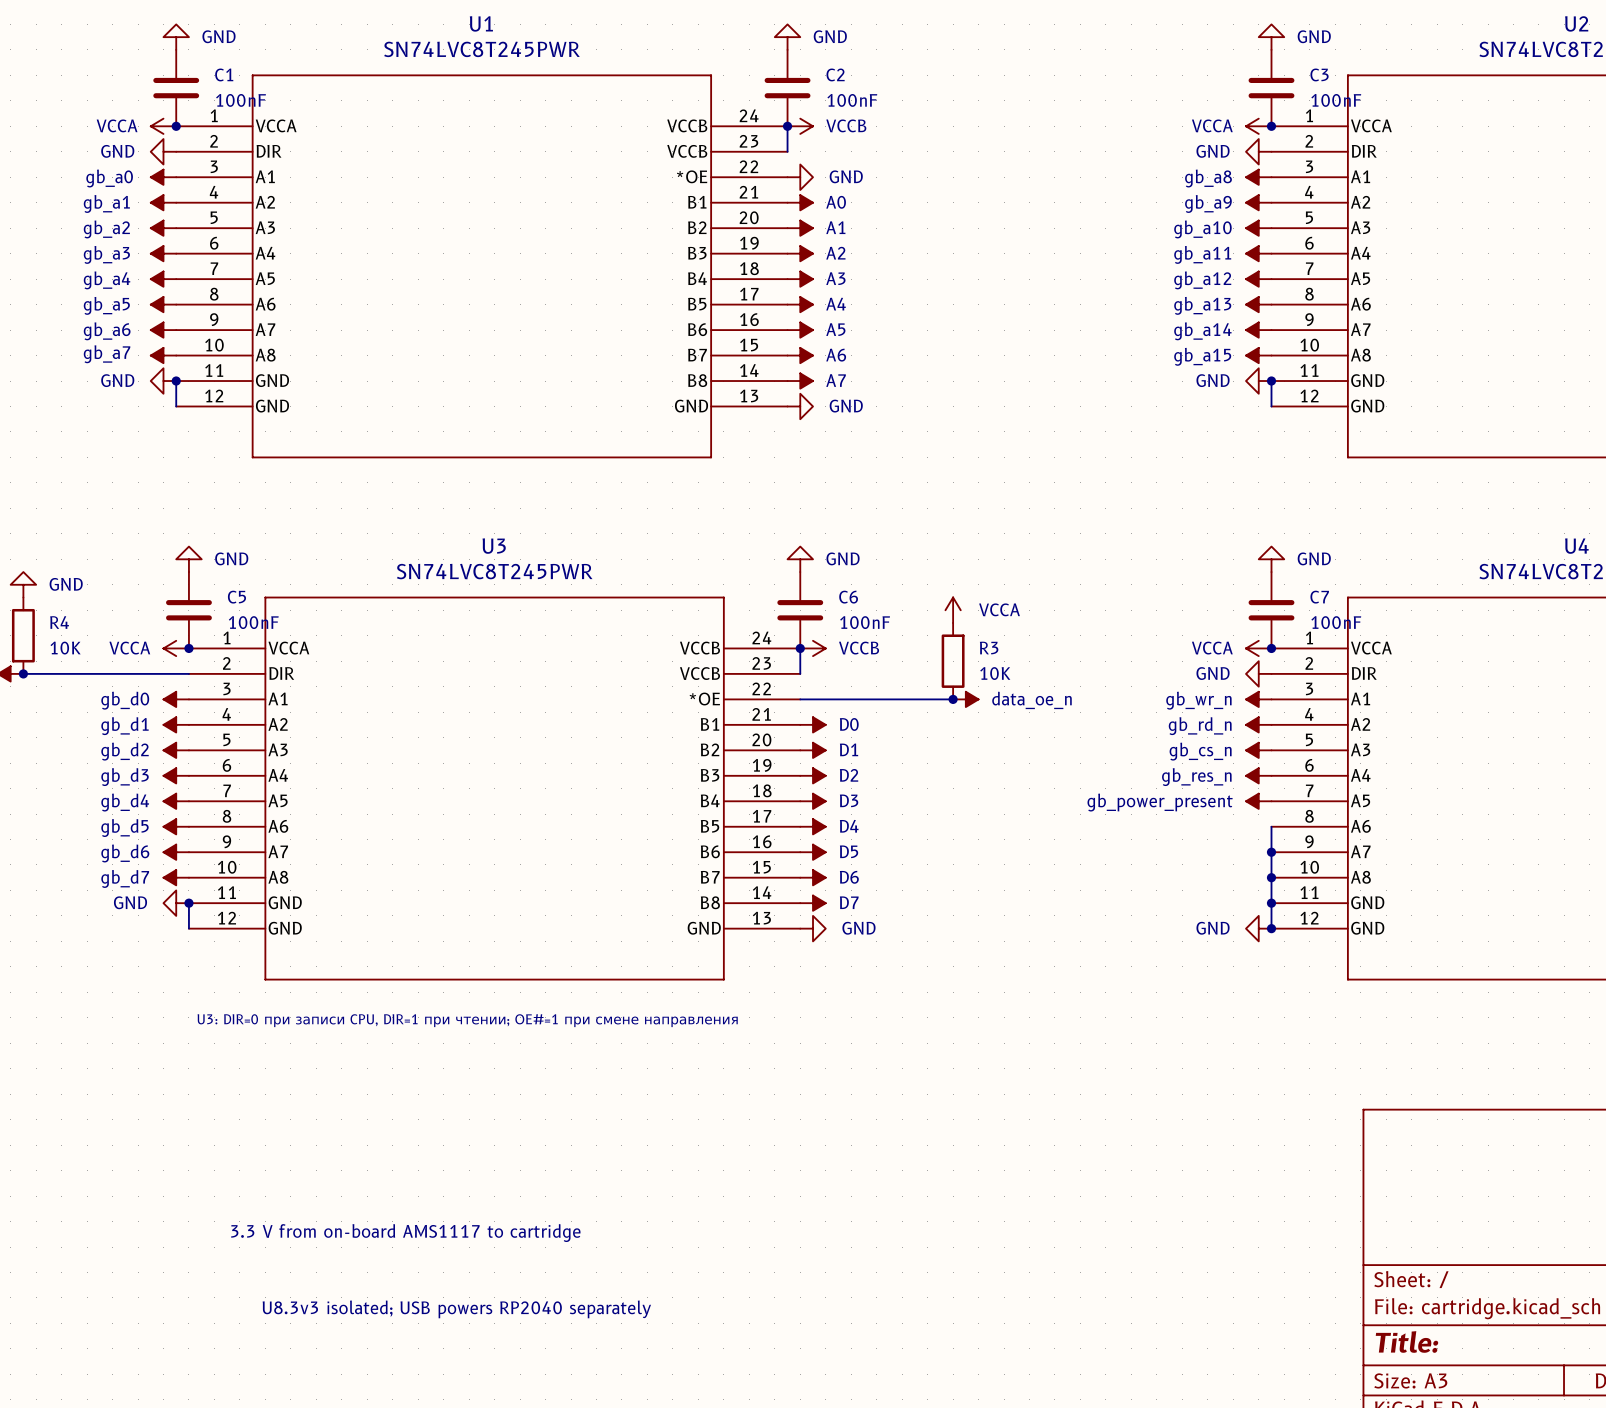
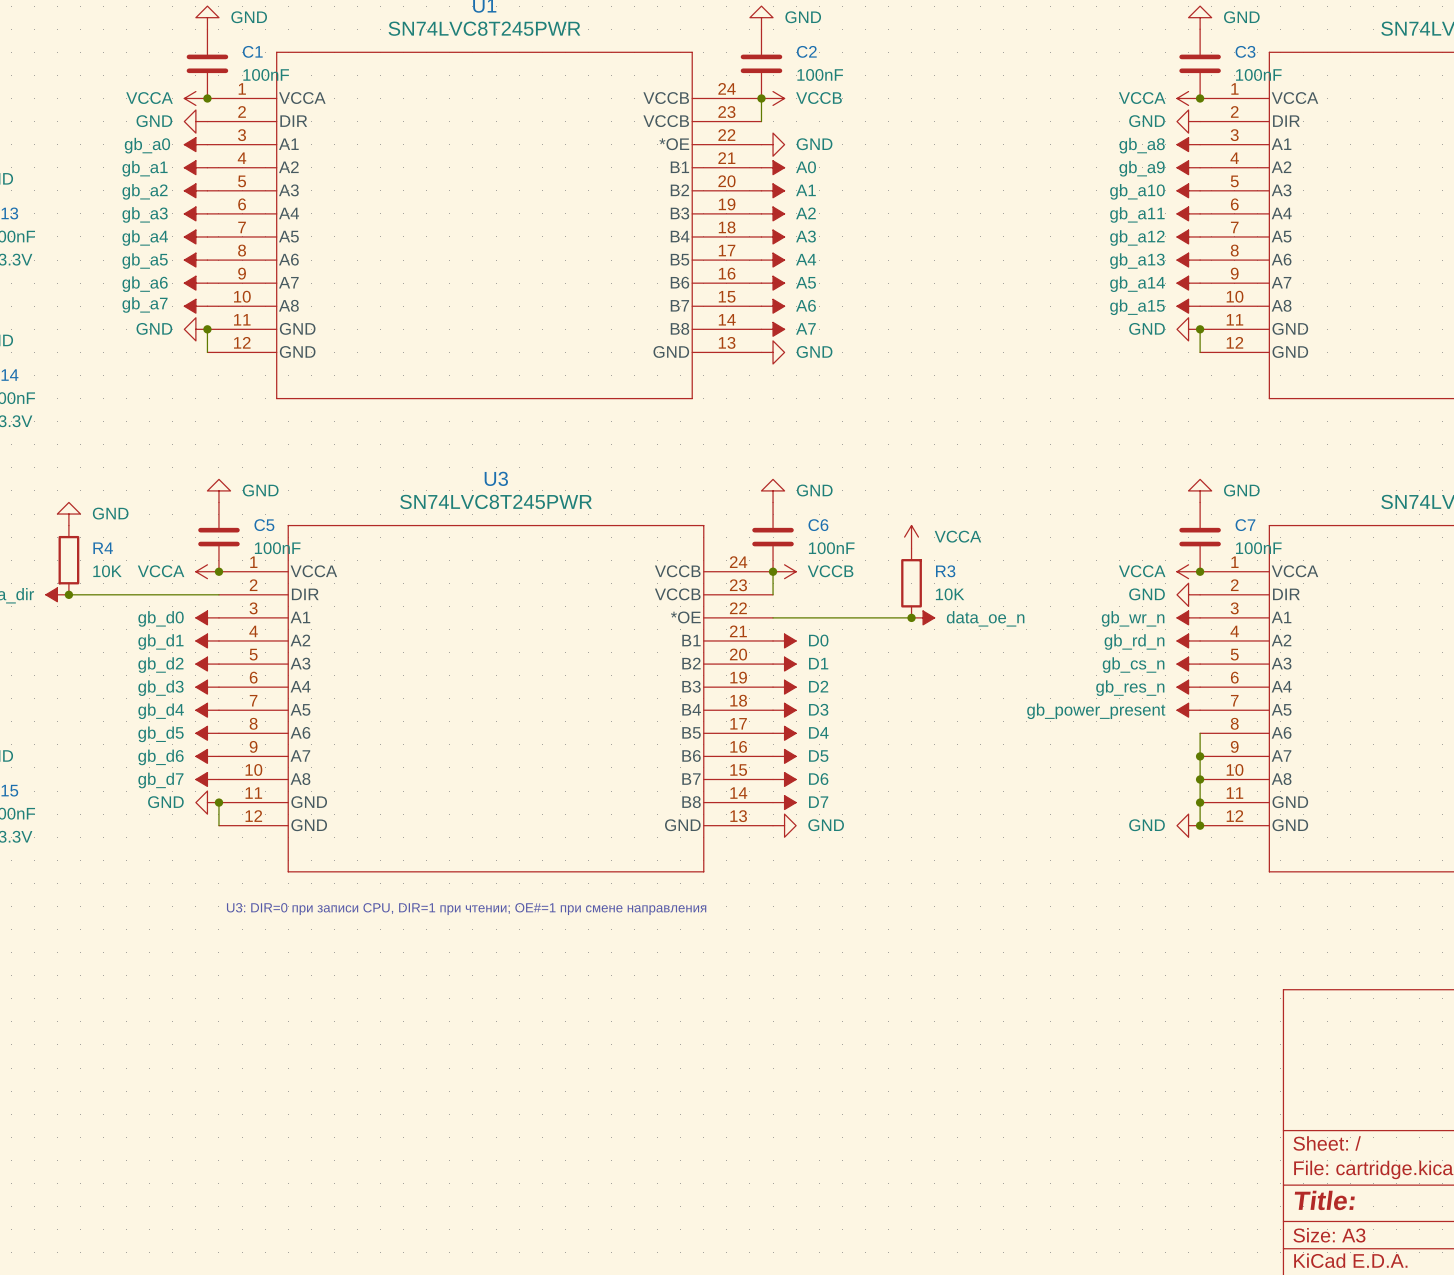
text: 3.3 V from on-board AMS1117 to cartridge (405, 1233) -> none
text: U8.3v3 isolated; USB powers RP2040 separately (456, 1309) -> none

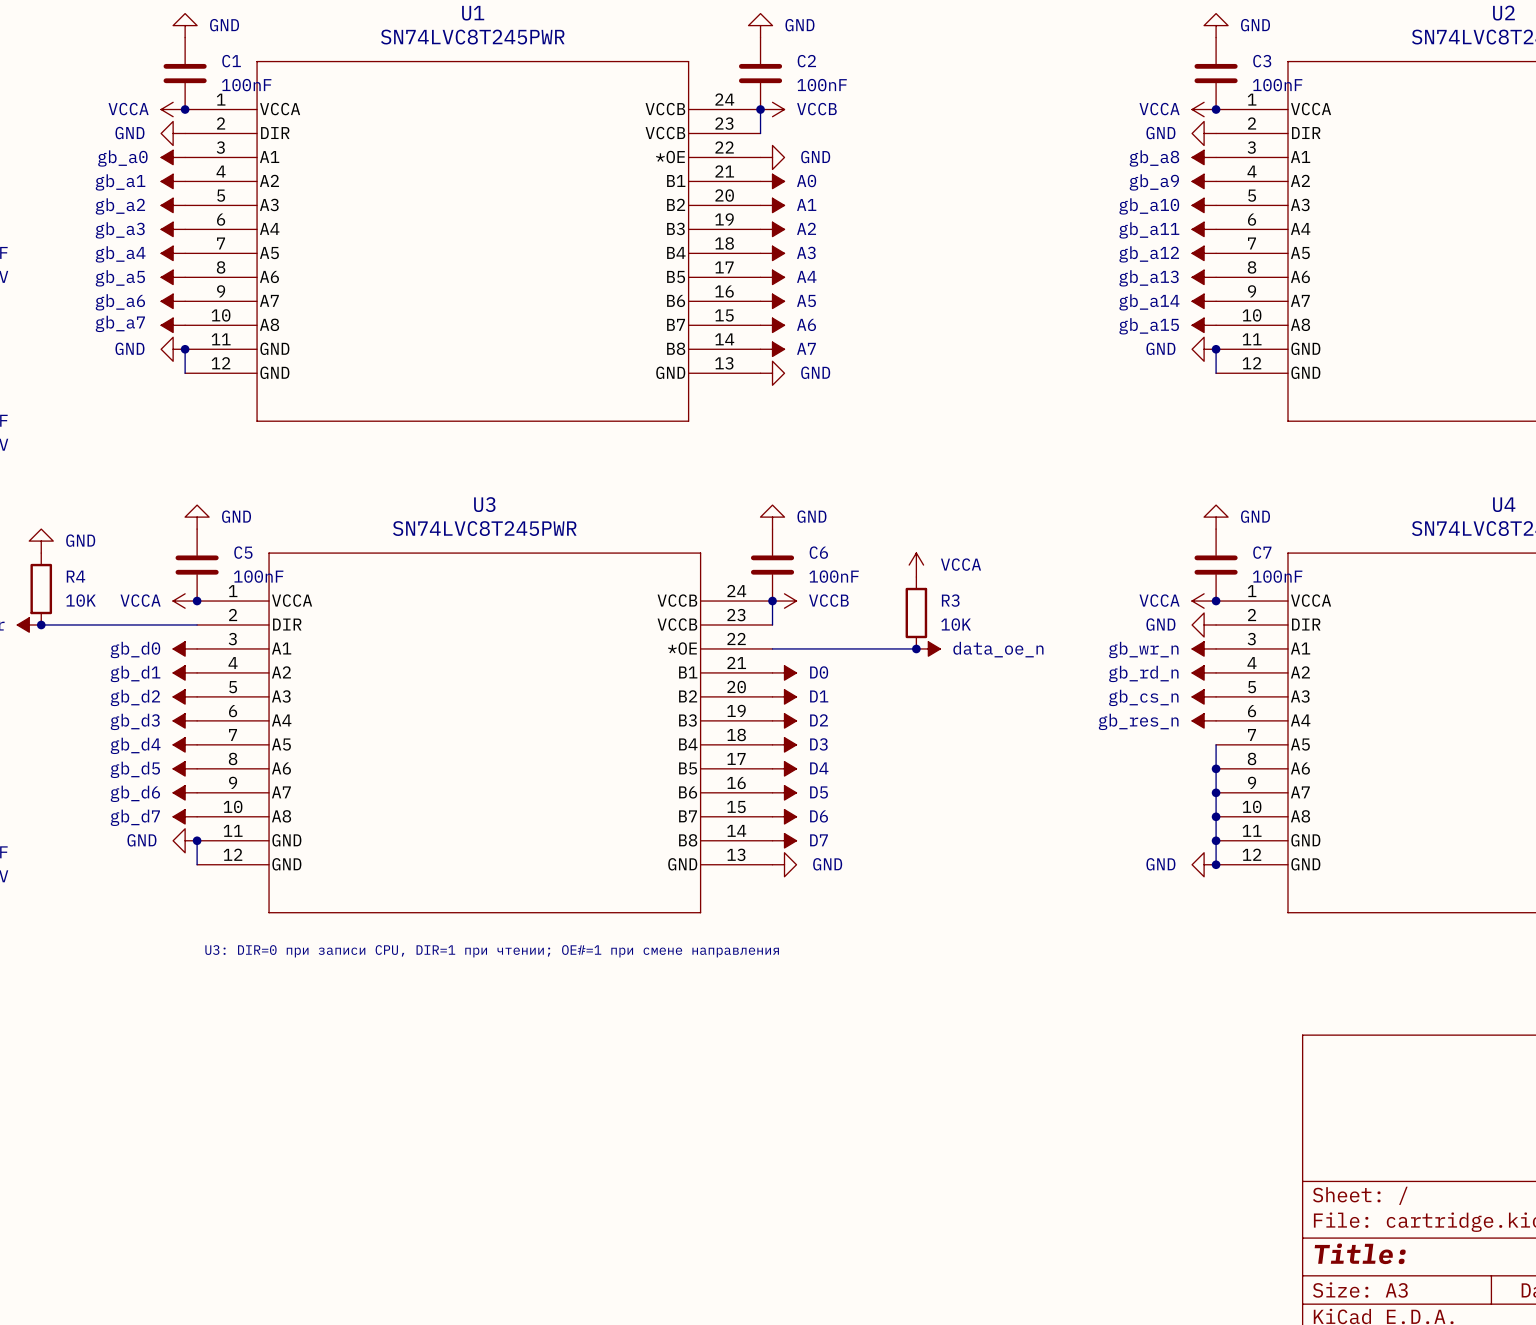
power symbol: gb_power_present (1188, 710) -> none
wire: none -> (1216, 744) (1216, 768)
junction: none -> (1216, 768)

